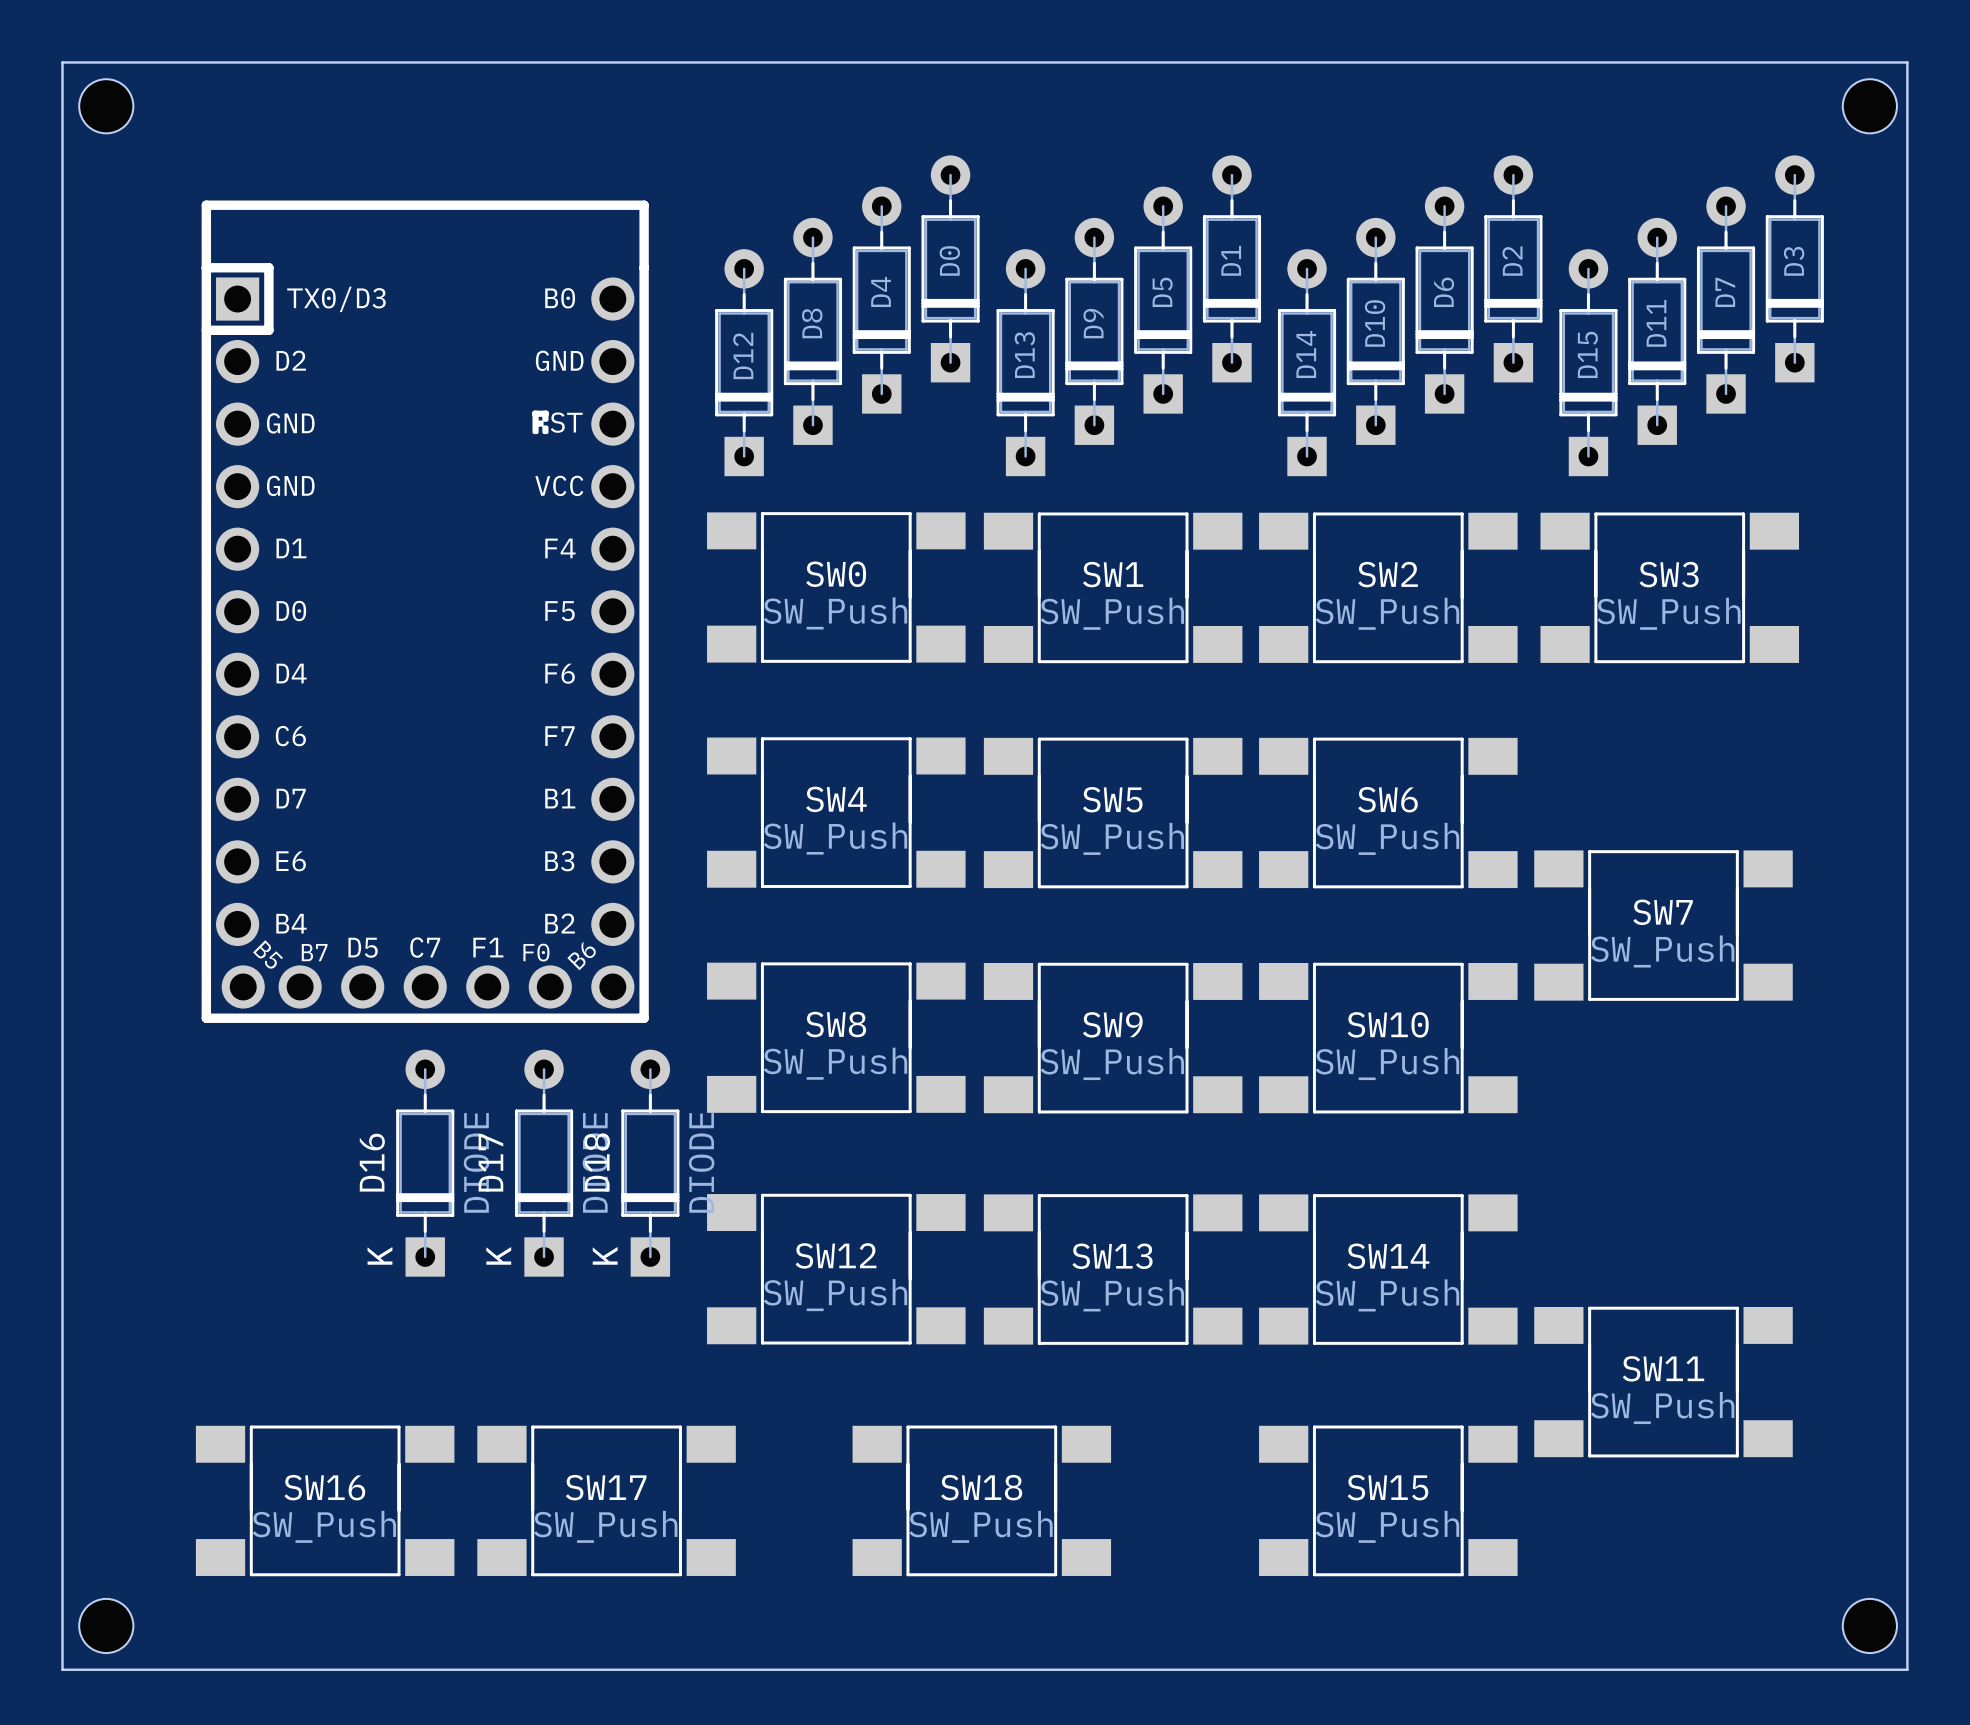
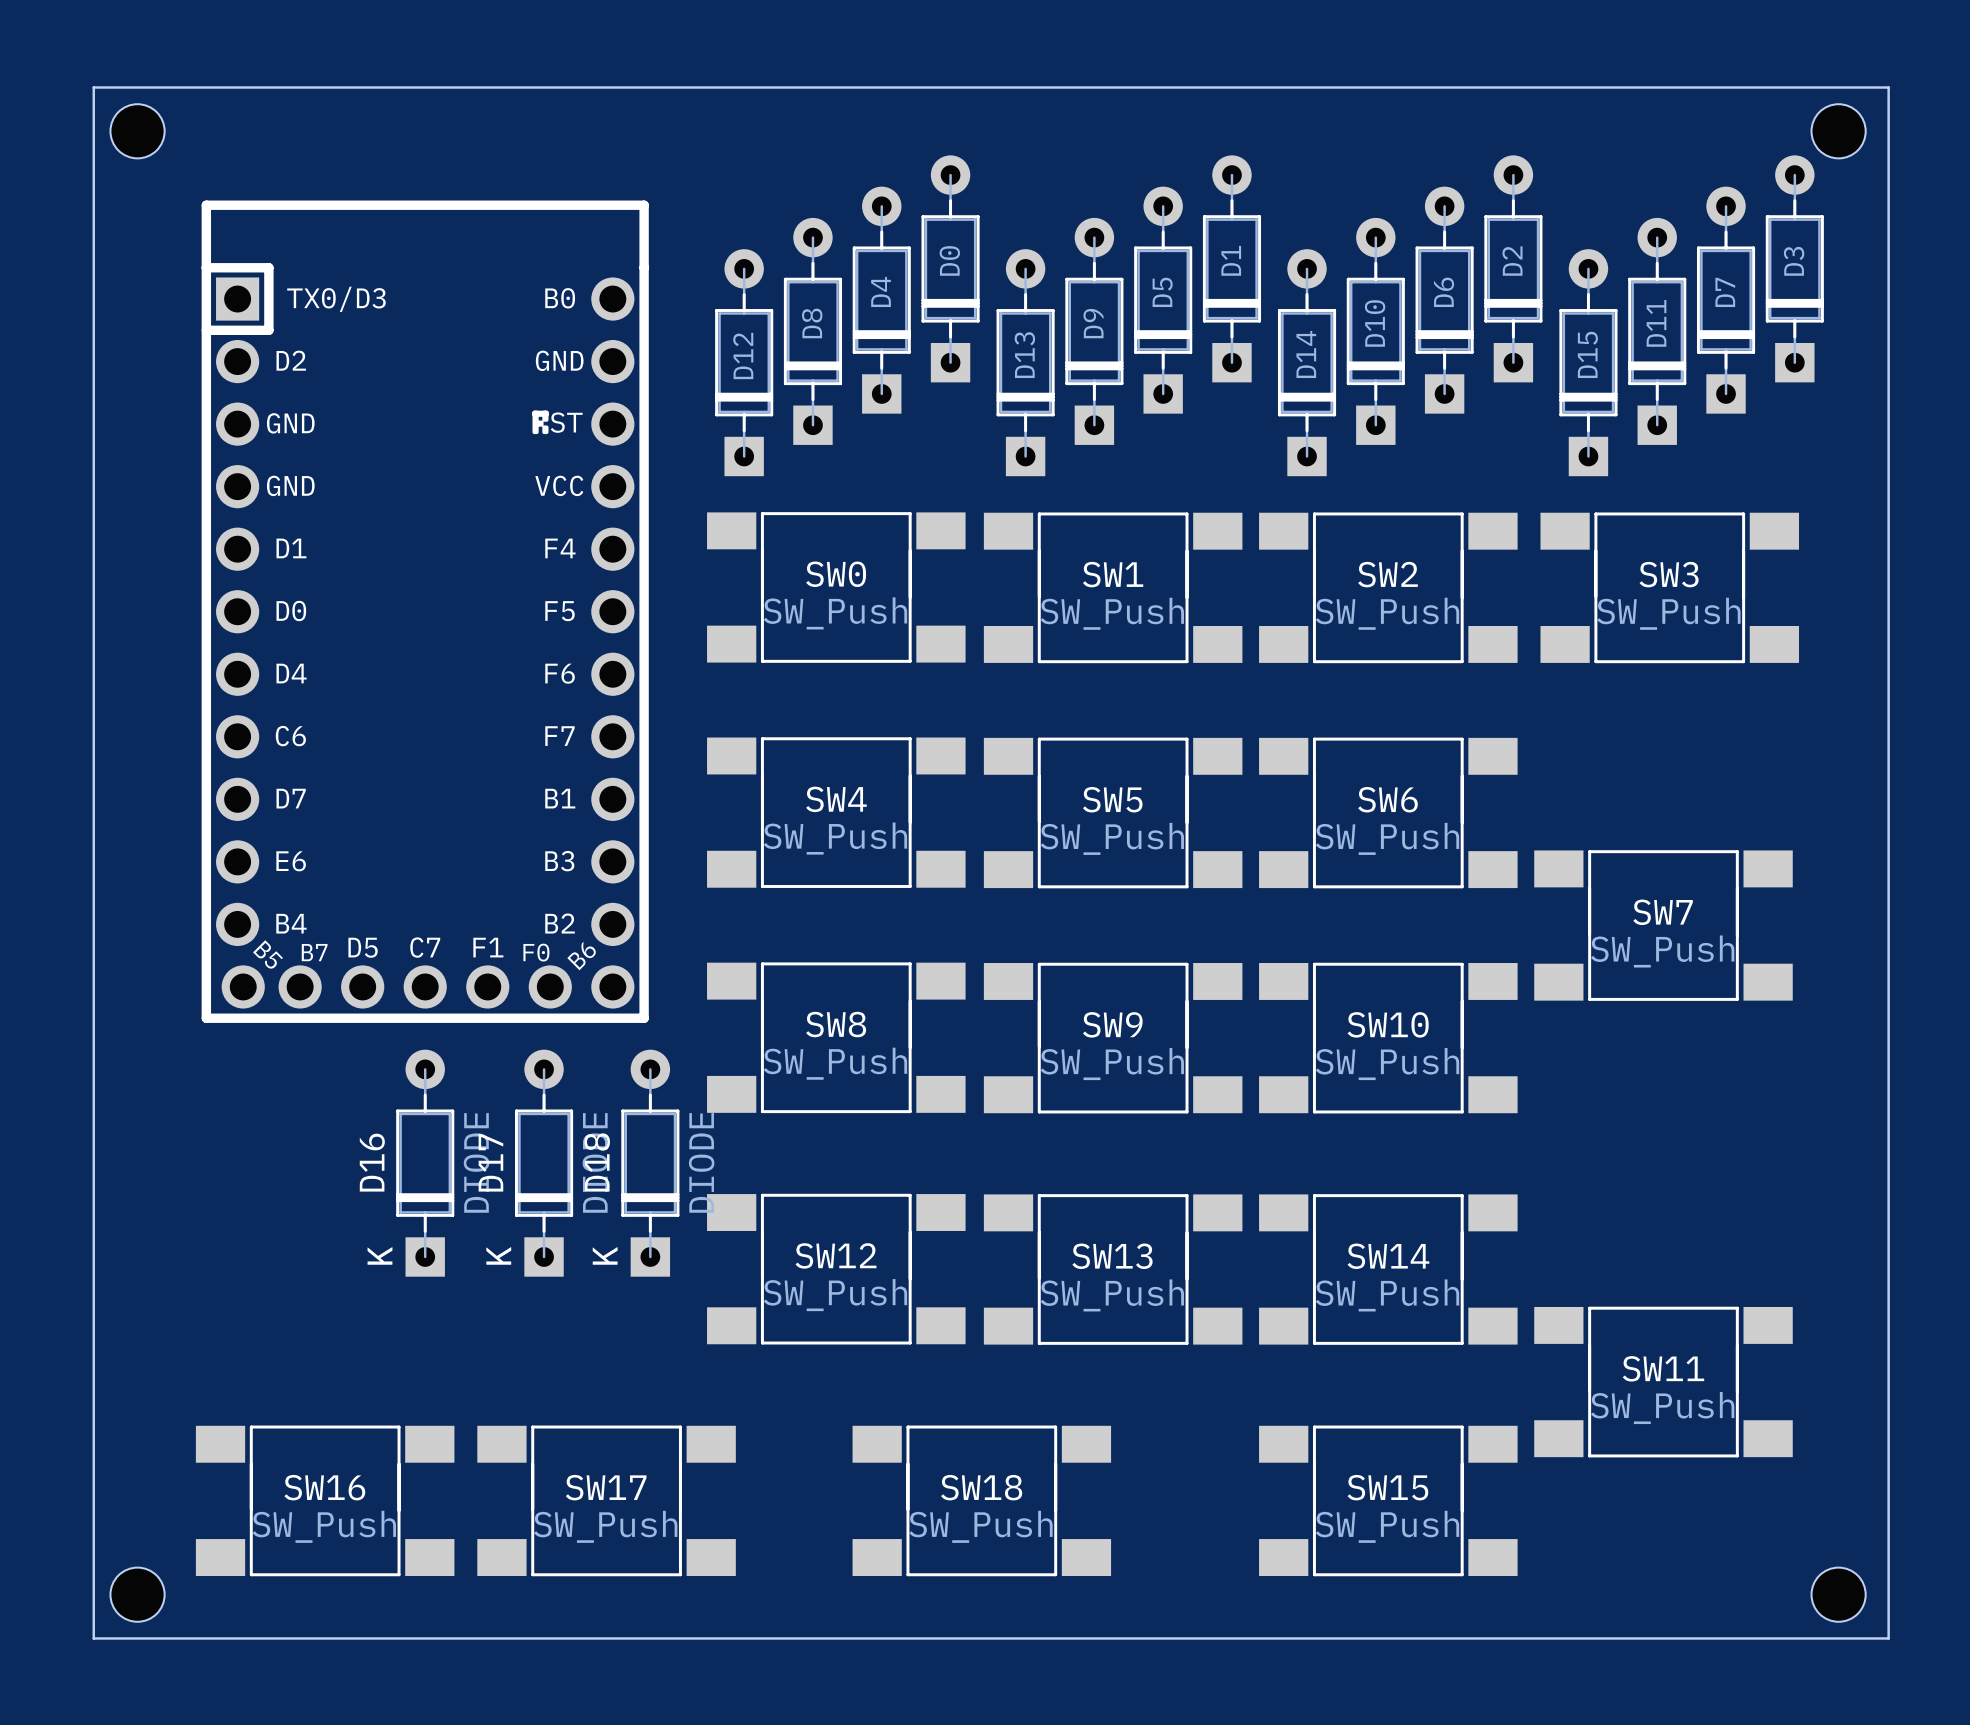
board edge: (62, 62) (1907, 62) (1907, 1669) (62, 1669) (62, 62) -> (93, 87) (93, 1638) (1888, 1638) (1888, 87) (93, 87)
part position: (106, 106) -> (137, 131)
part position: (1869, 106) -> (1838, 131)
part position: (106, 1625) -> (137, 1594)
part position: (1869, 1625) -> (1838, 1594)

